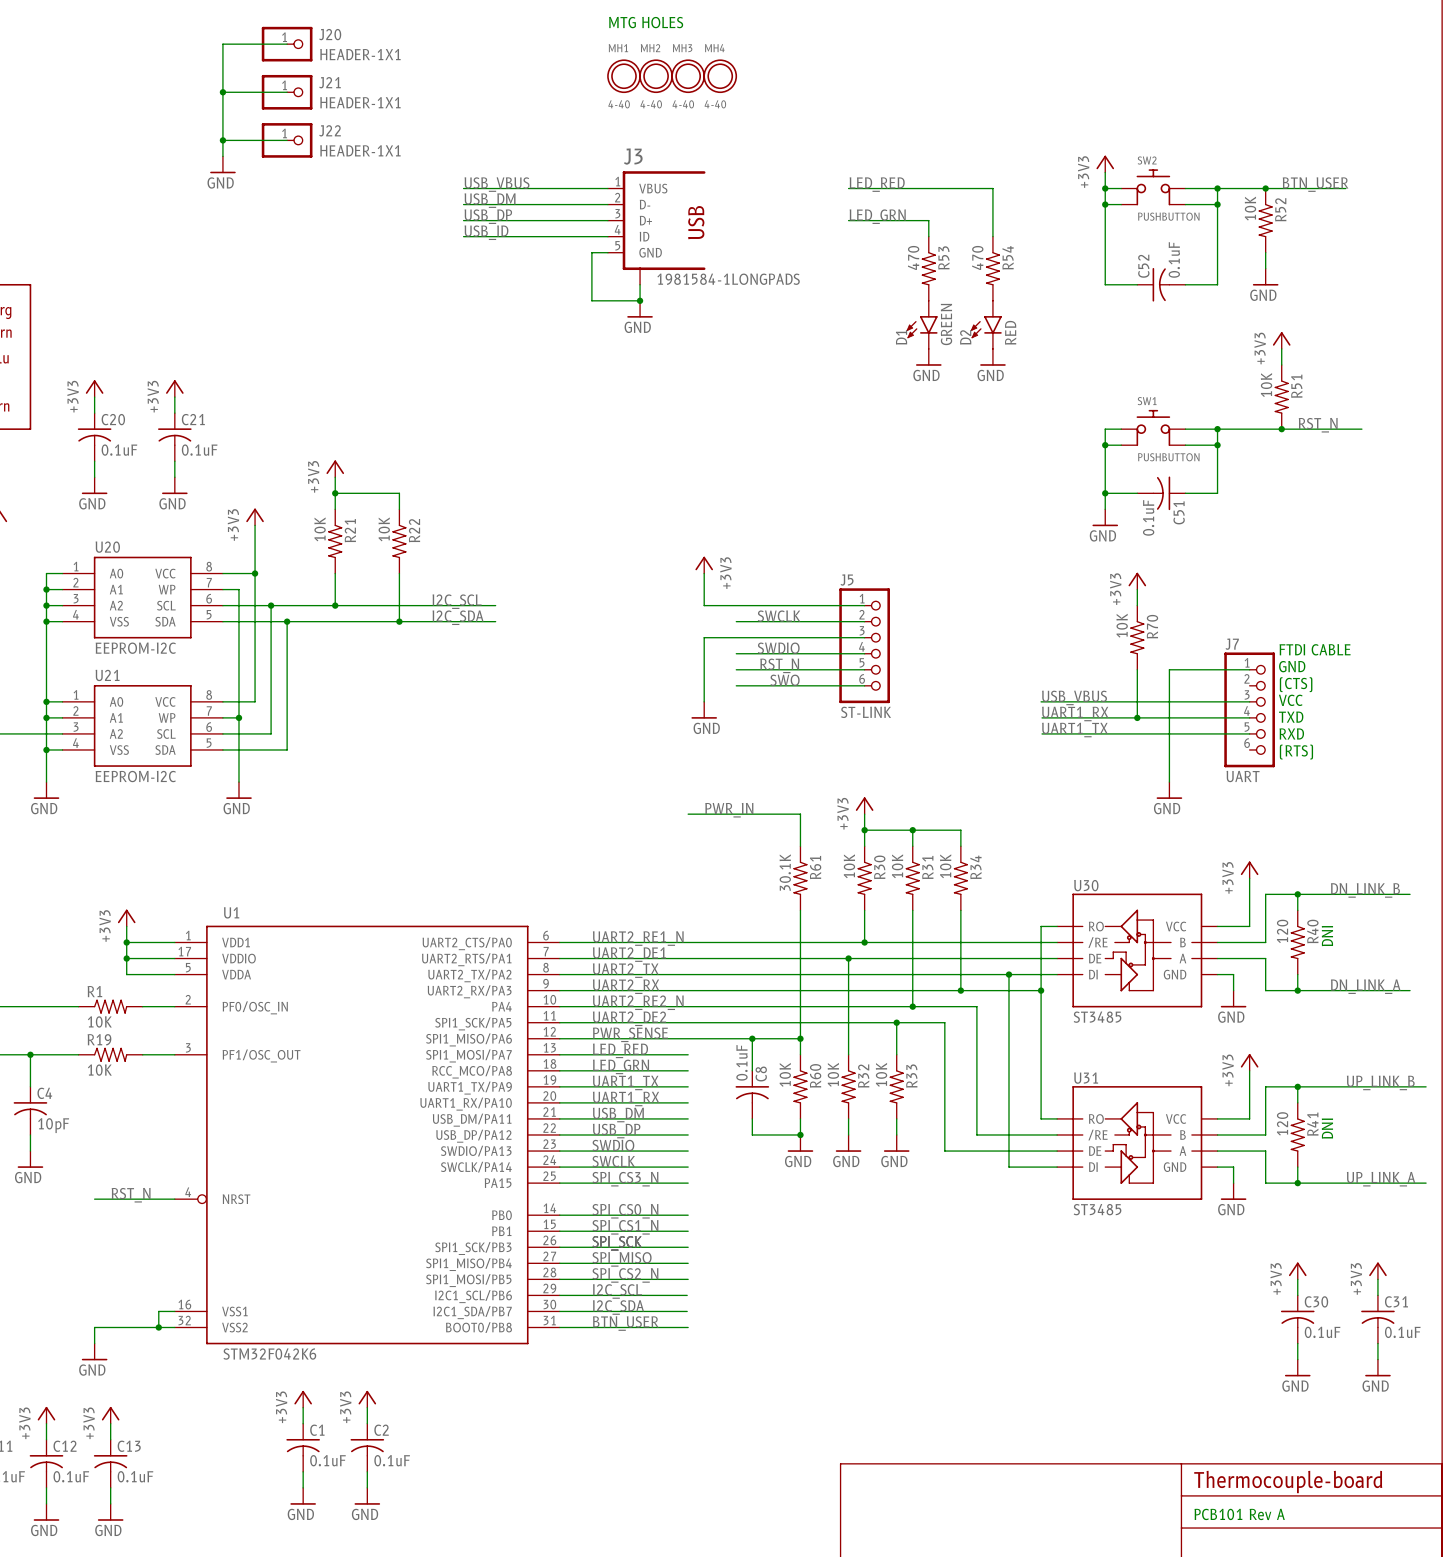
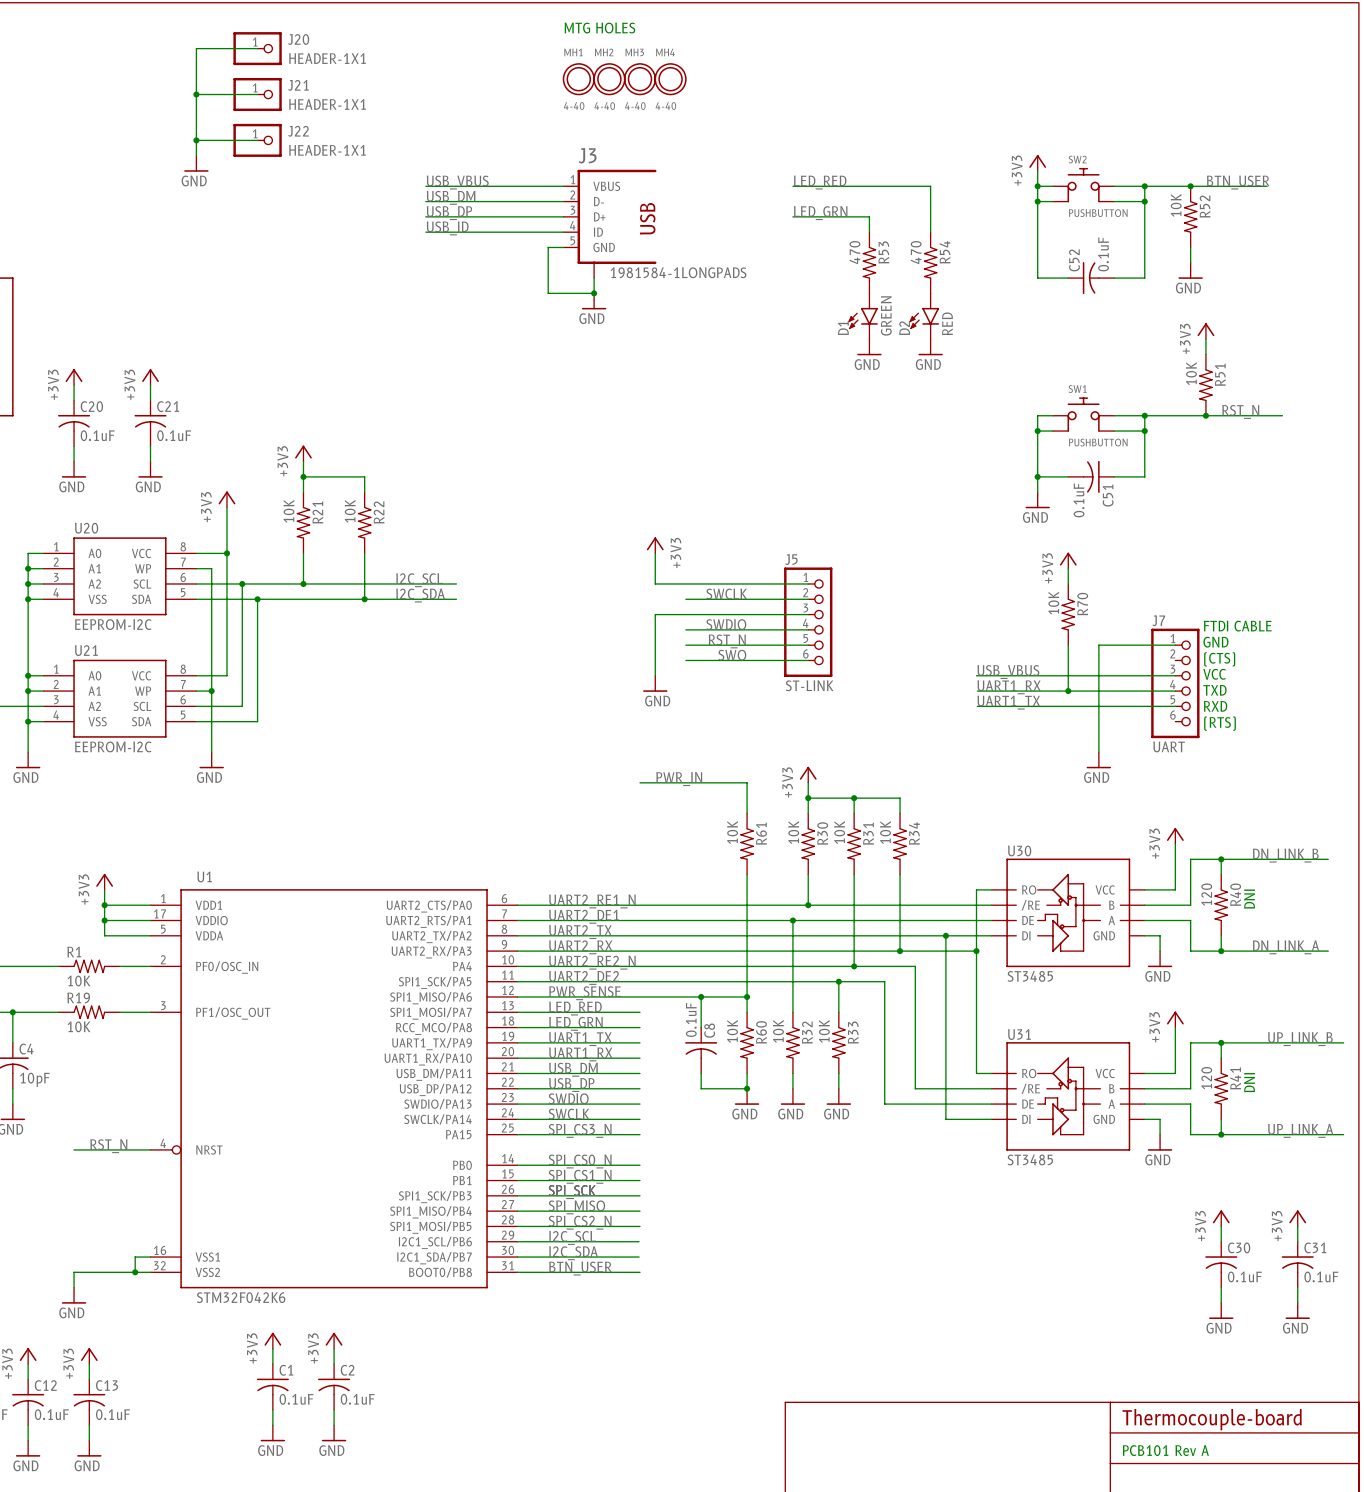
R61 value: 30.1K (785, 872) -> 10K (732, 832)

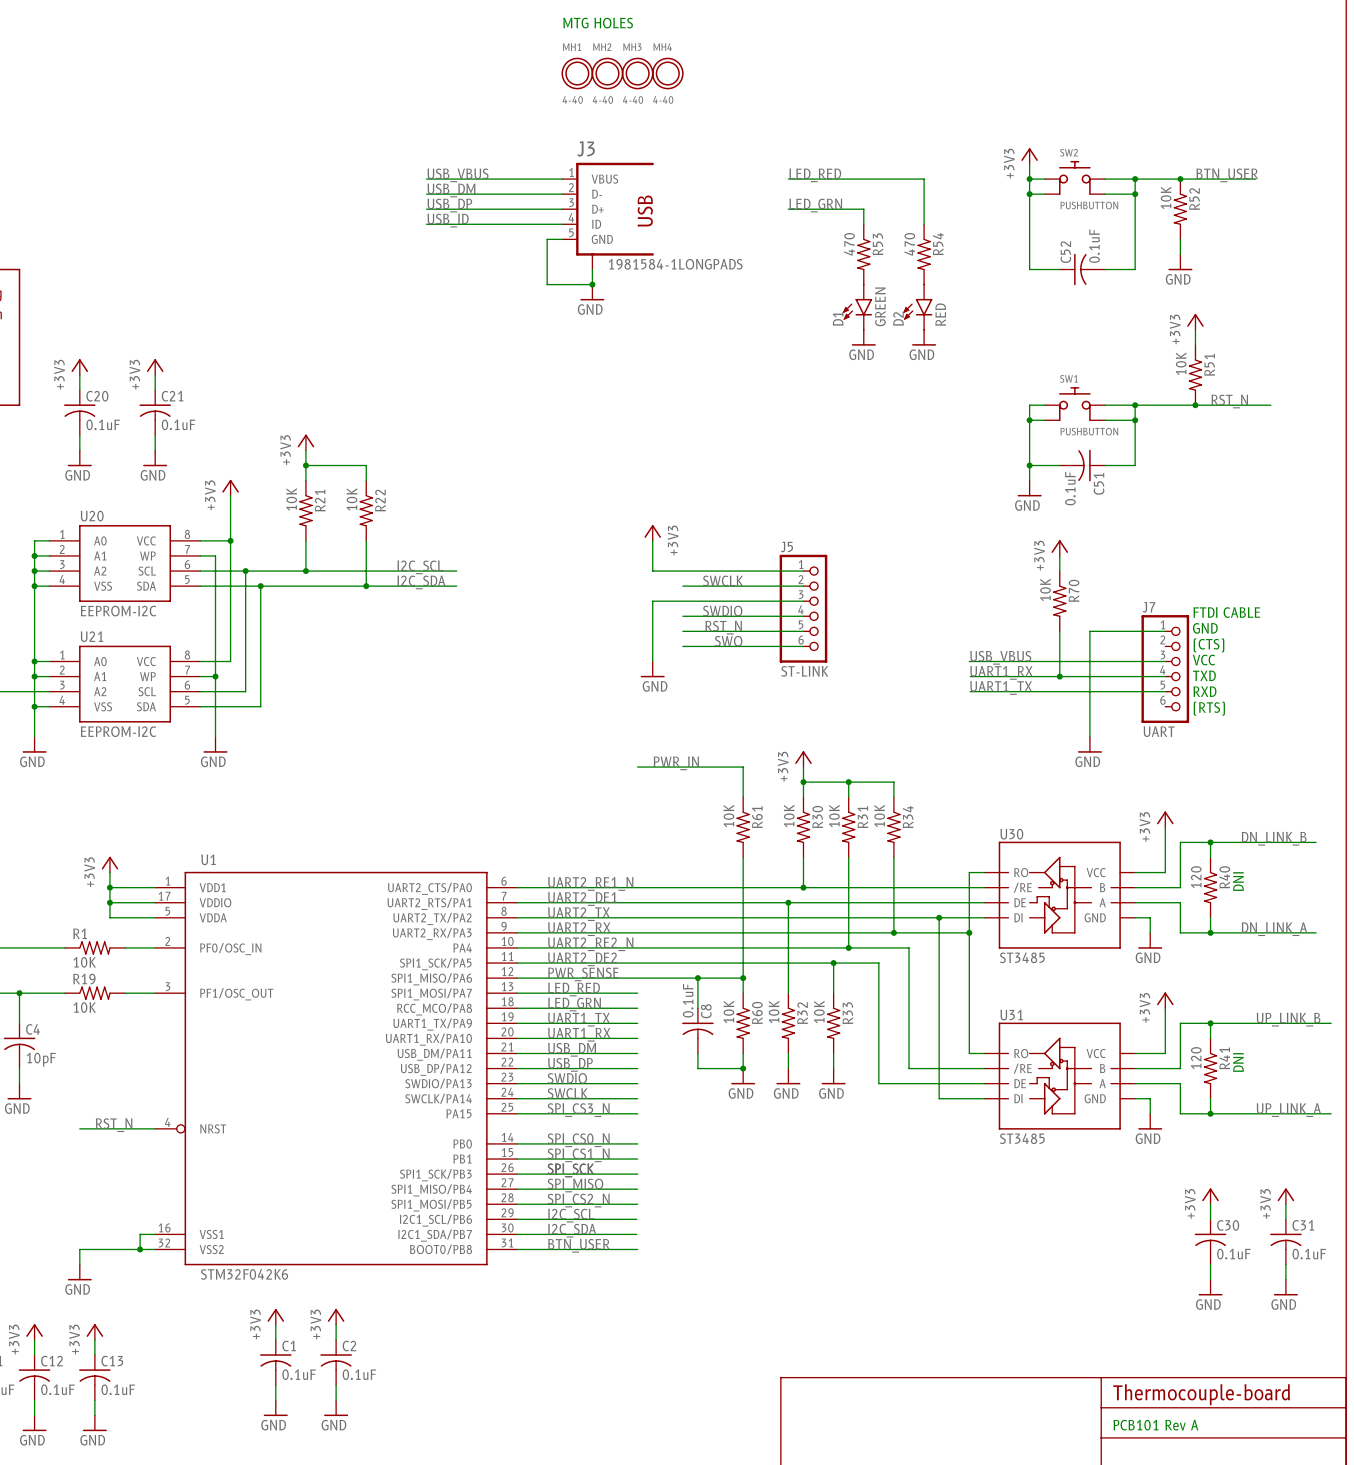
wire: (257, 48) (196, 48) (196, 155) -> none
J20: HEADER-1X1 (257, 48) -> none
wire: (196, 94) (257, 94) -> none
junction: (196, 94) -> none
J21: HEADER-1X1 (257, 94) -> none
wire: (196, 140) (257, 140) -> none
junction: (196, 140) -> none
J22: HEADER-1X1 (257, 140) -> none
power symbol: GND (196, 163) -> none

